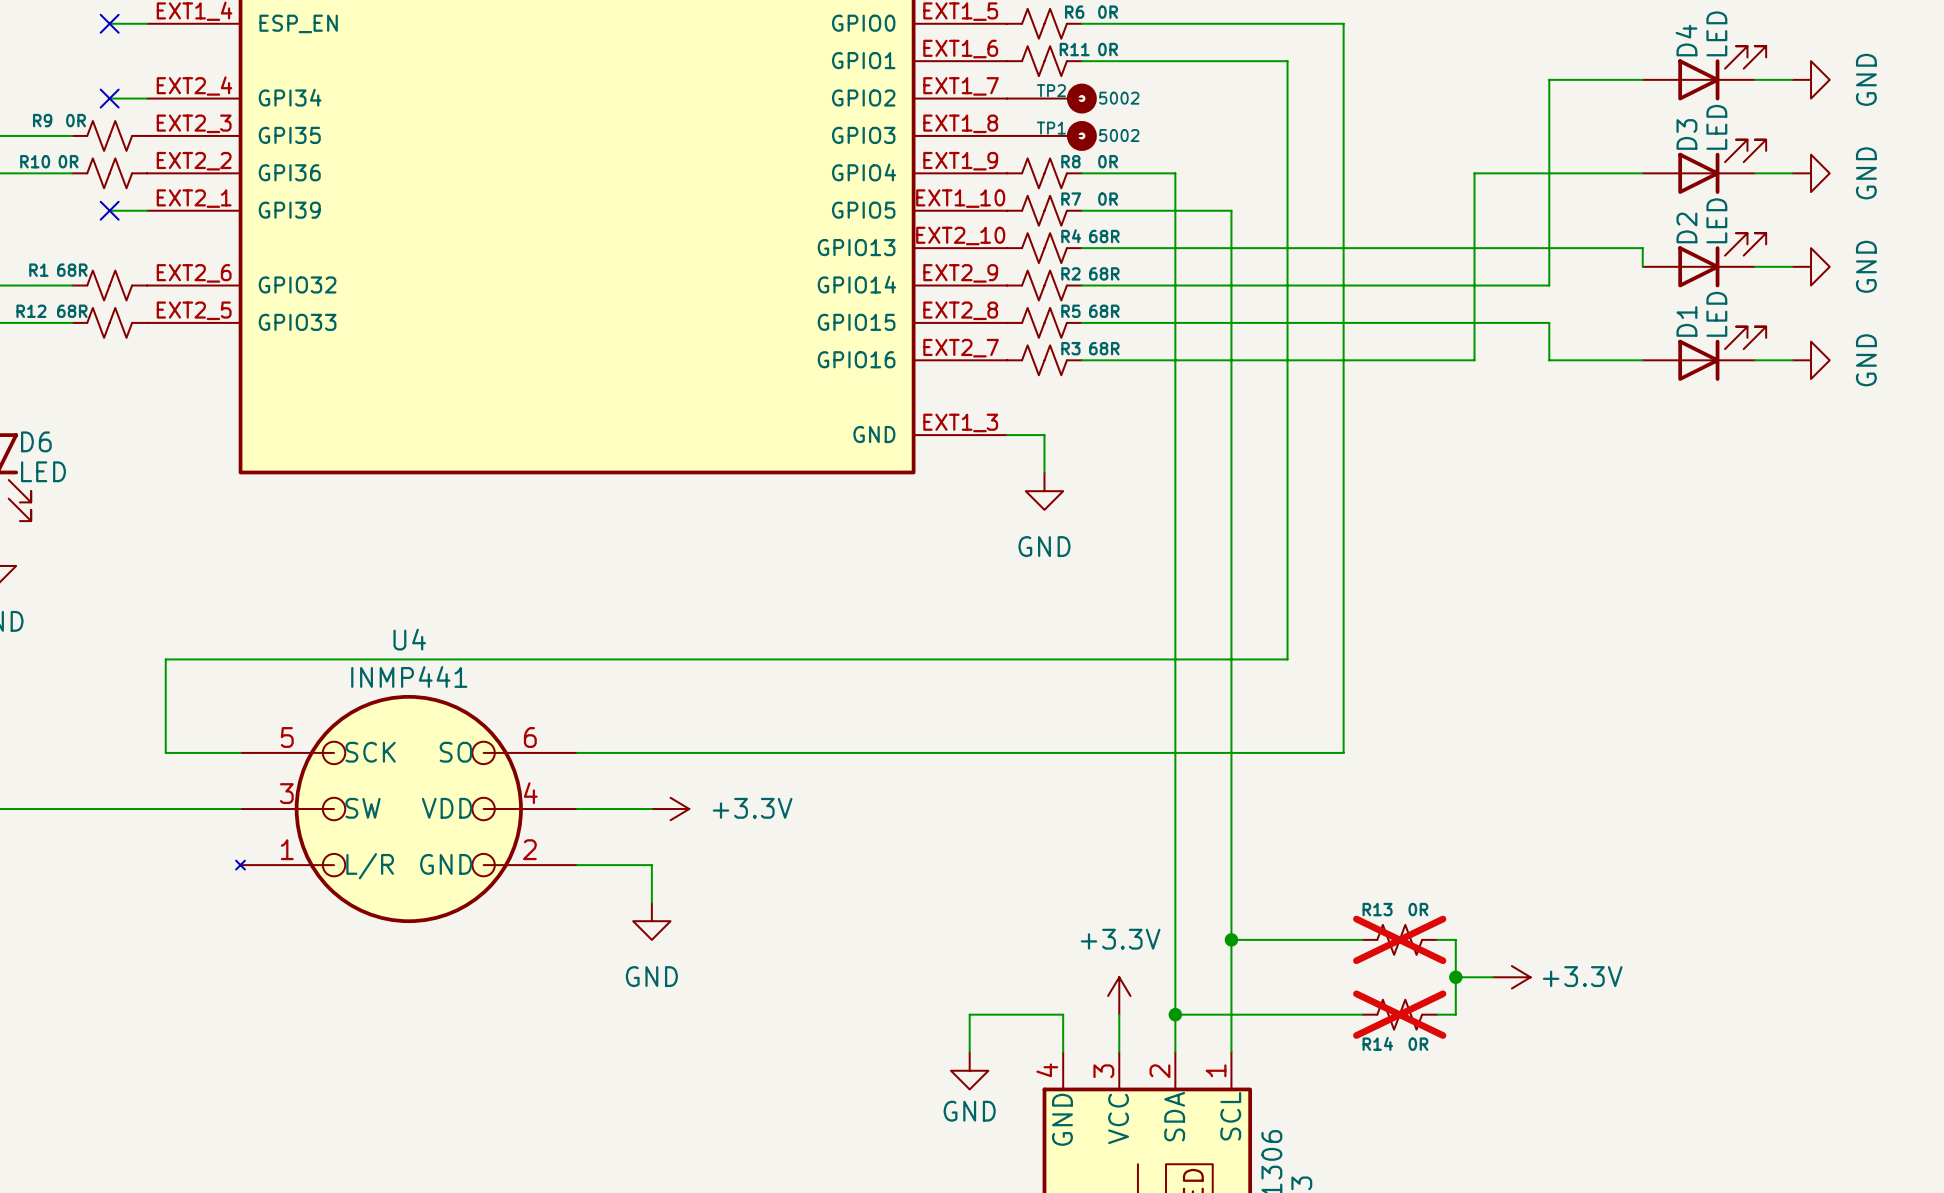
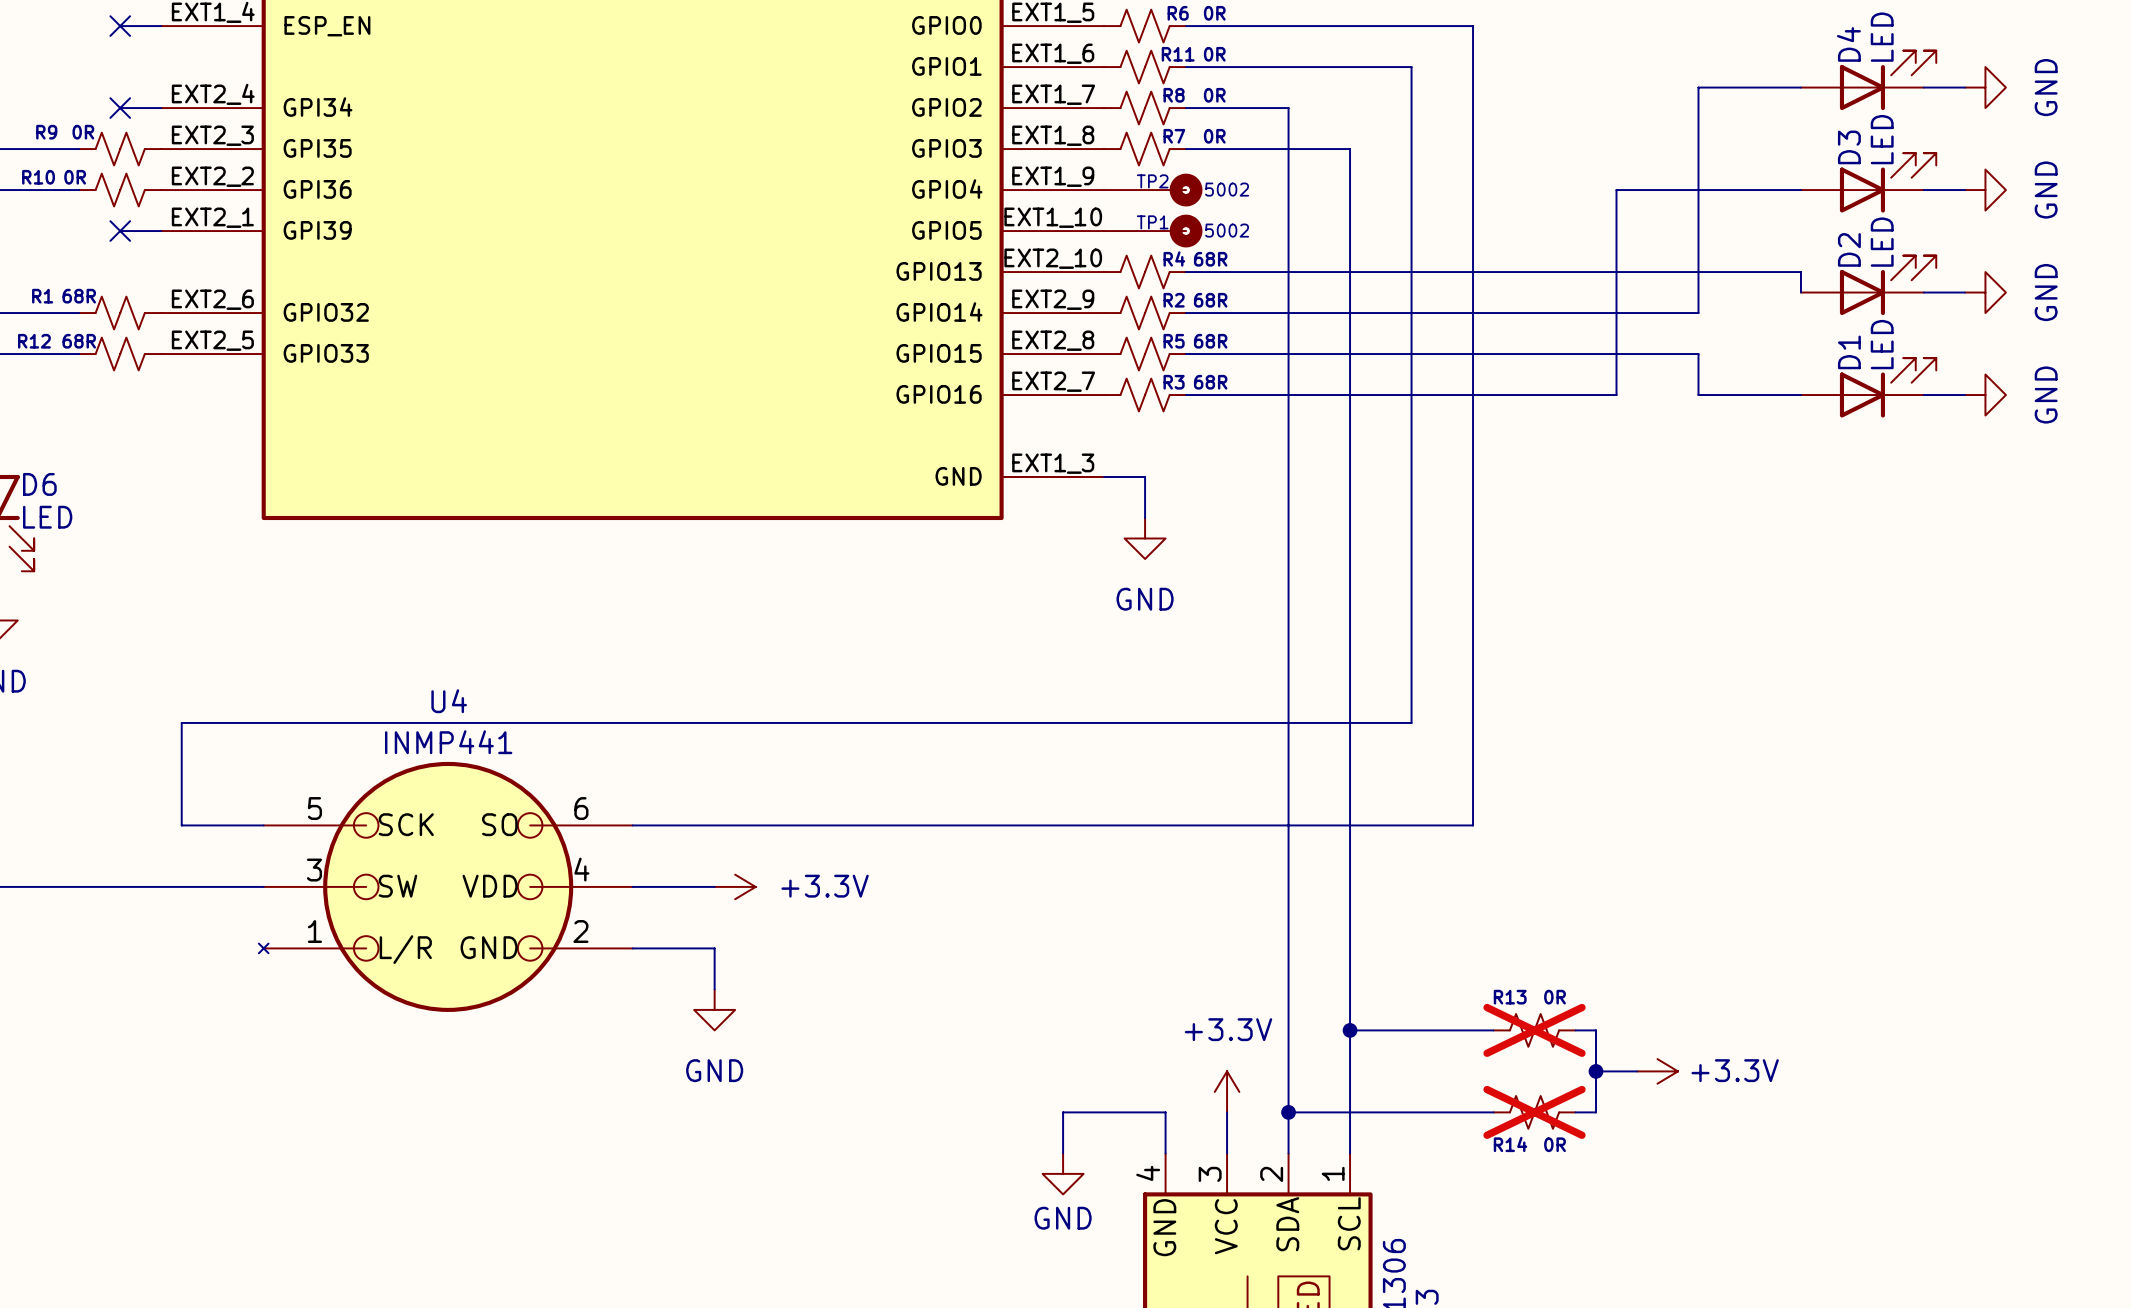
TP2 position: (1051, 98) -> (1153, 190)
TP1 position: (1051, 135) -> (1153, 231)
R8 position: (1044, 173) -> (1145, 108)
wire: (1081, 173) (1175, 173) -> (1186, 108) (1288, 108) (1288, 190)
R7 position: (1044, 210) -> (1145, 149)
wire: (1081, 210) (1231, 210) -> (1186, 149) (1350, 149) (1350, 231)

